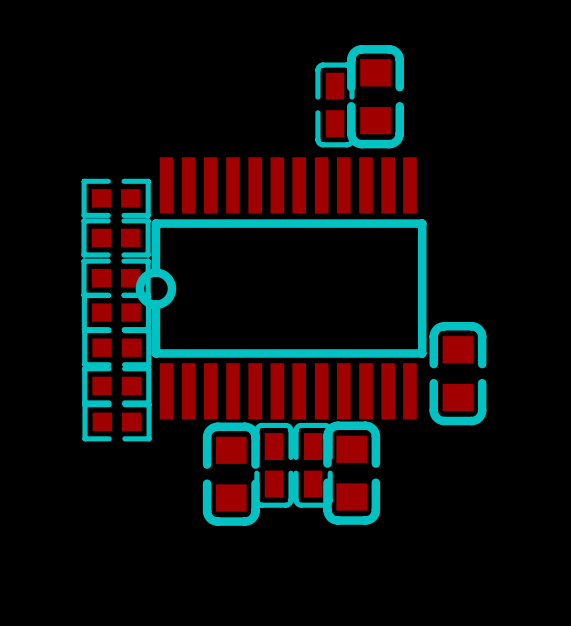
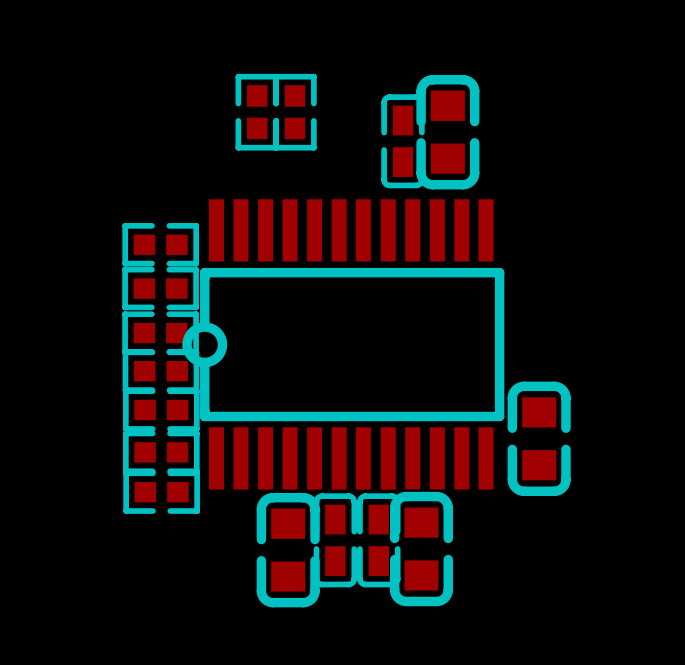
part: none -> (257, 112)
part: none -> (294, 112)

